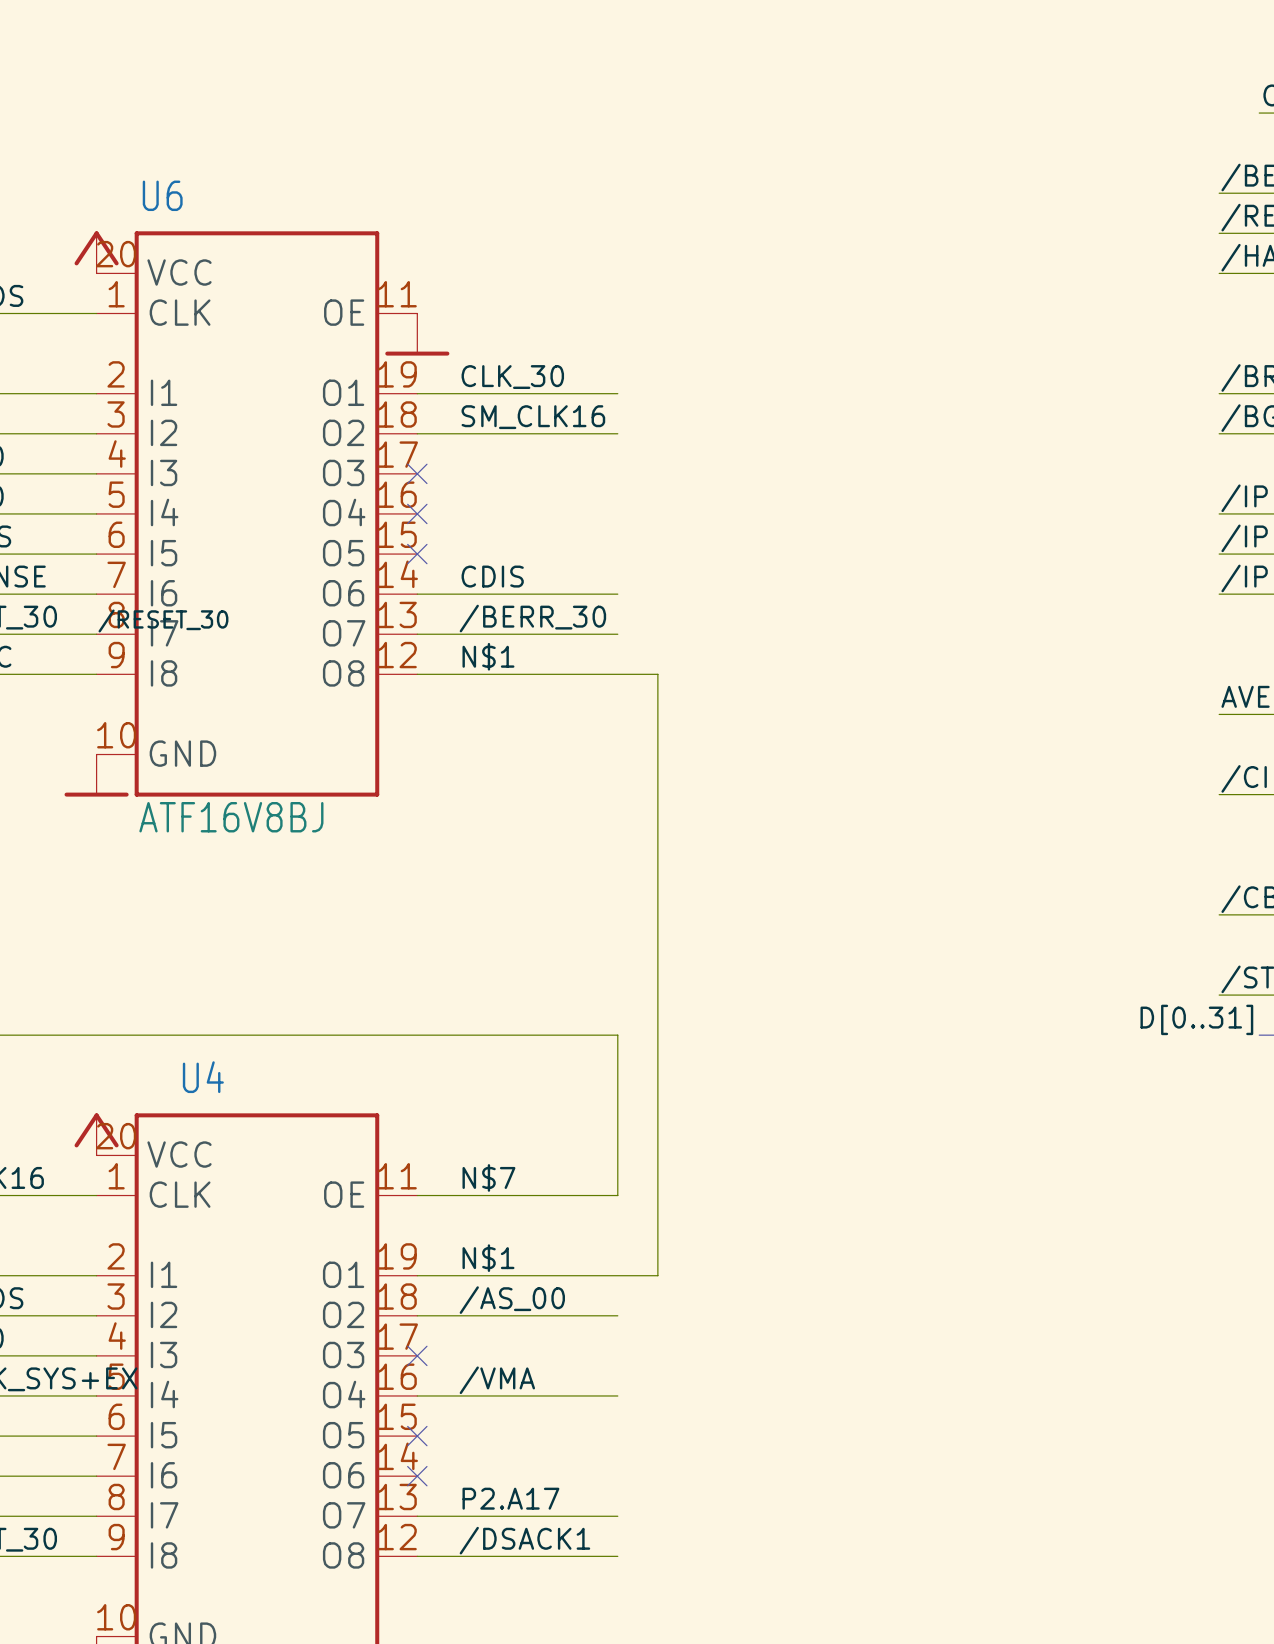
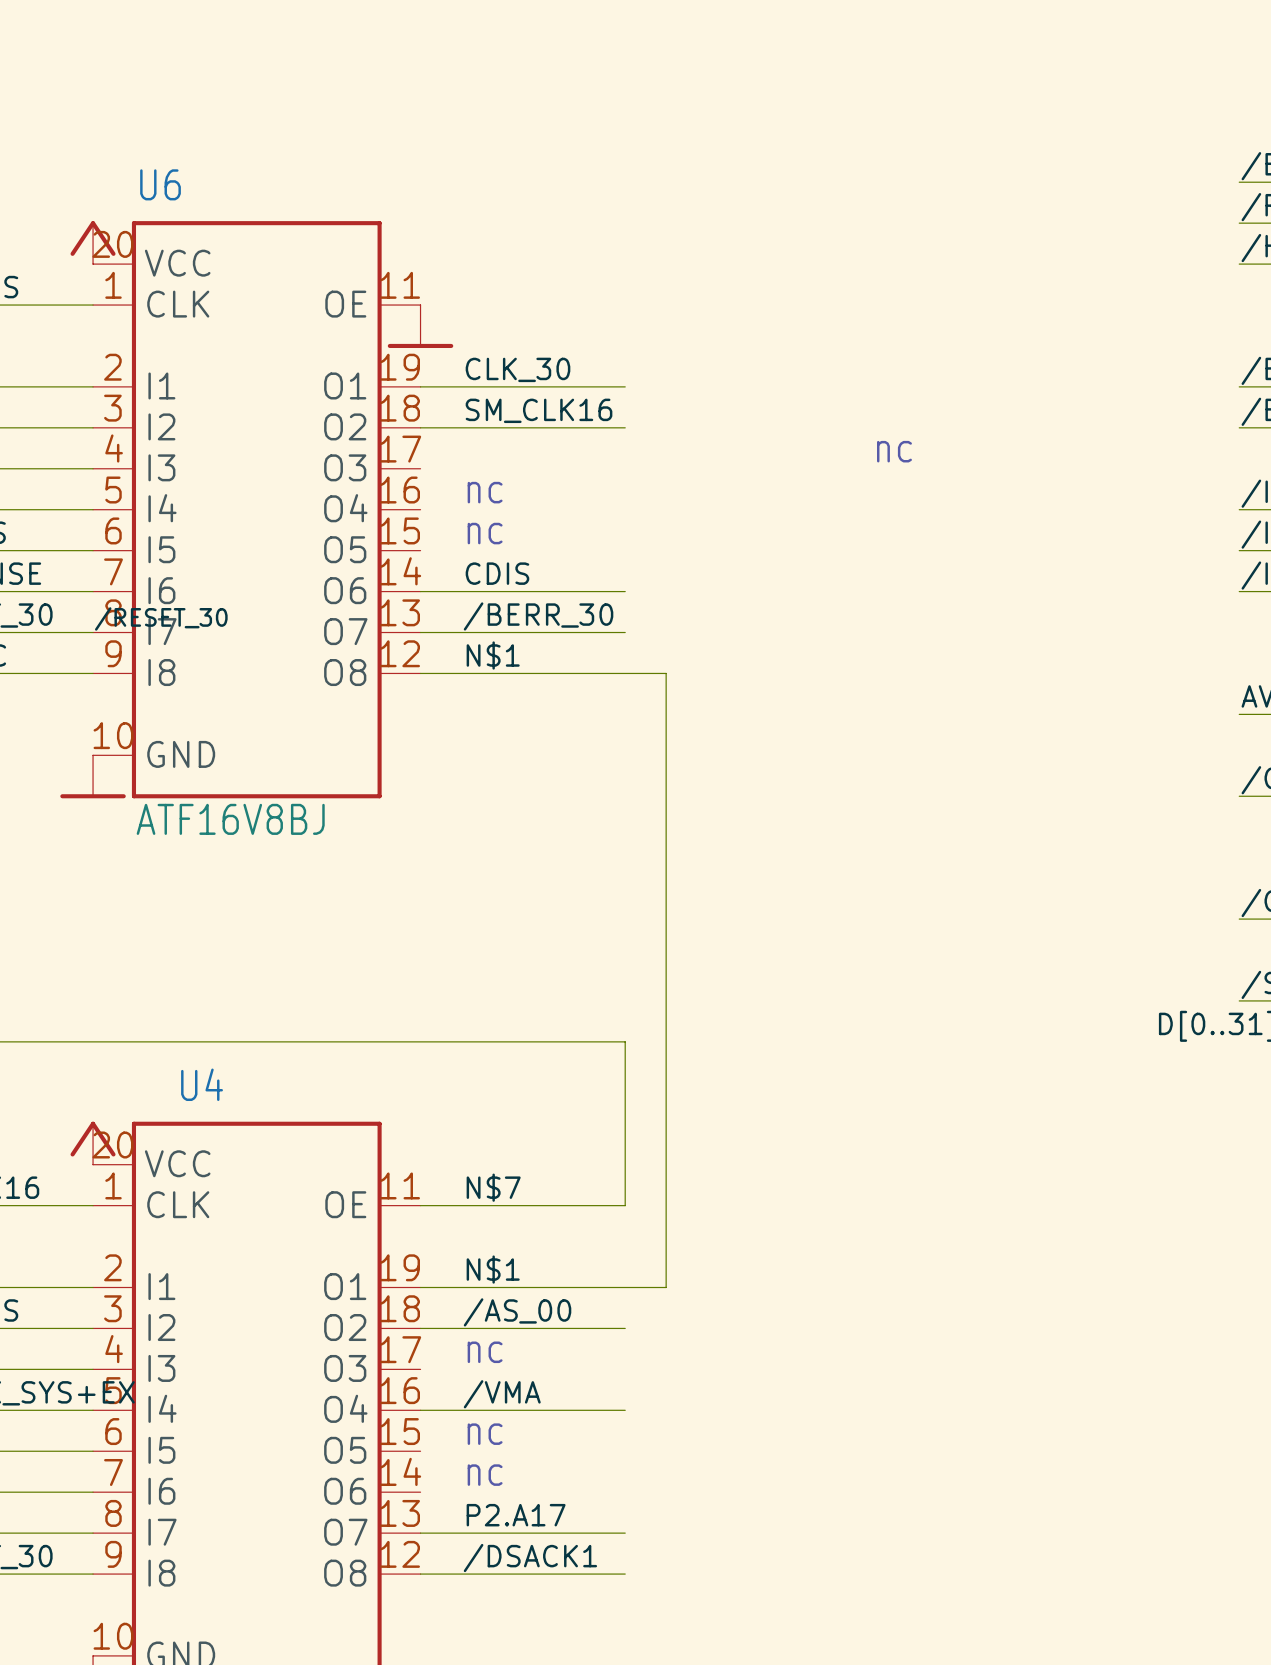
text: none -> nc (894, 451)
no-connect mark: (417, 473) -> none
text: none -> nc (485, 492)
no-connect mark: (417, 513) -> none
text: none -> nc (485, 533)
no-connect mark: (417, 554) -> none
text: none -> nc (485, 1352)
no-connect mark: (417, 1355) -> none
text: none -> nc (485, 1434)
no-connect mark: (417, 1436) -> none
text: none -> nc (485, 1475)
no-connect mark: (417, 1476) -> none

